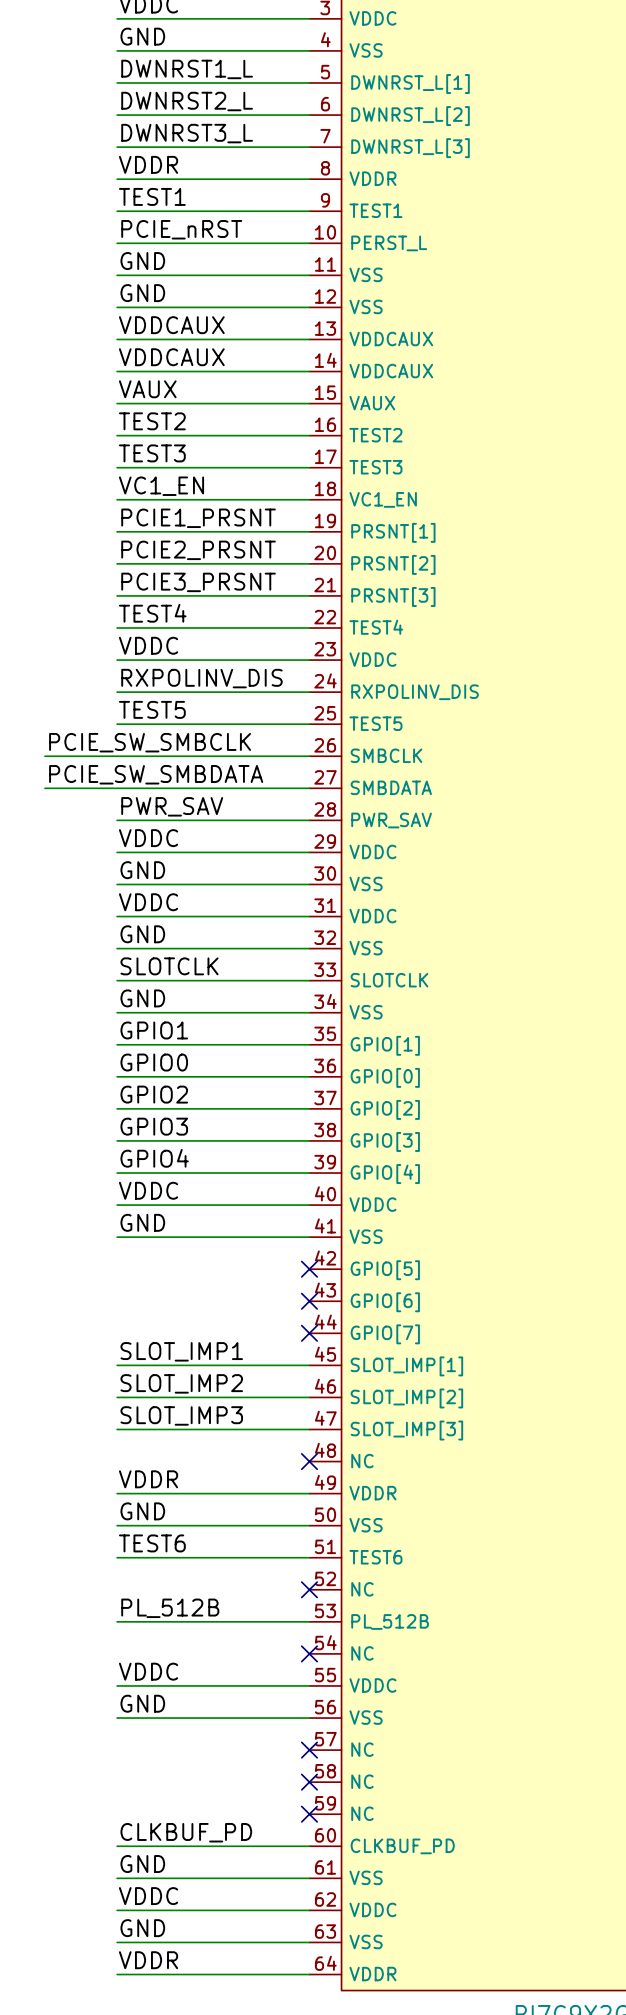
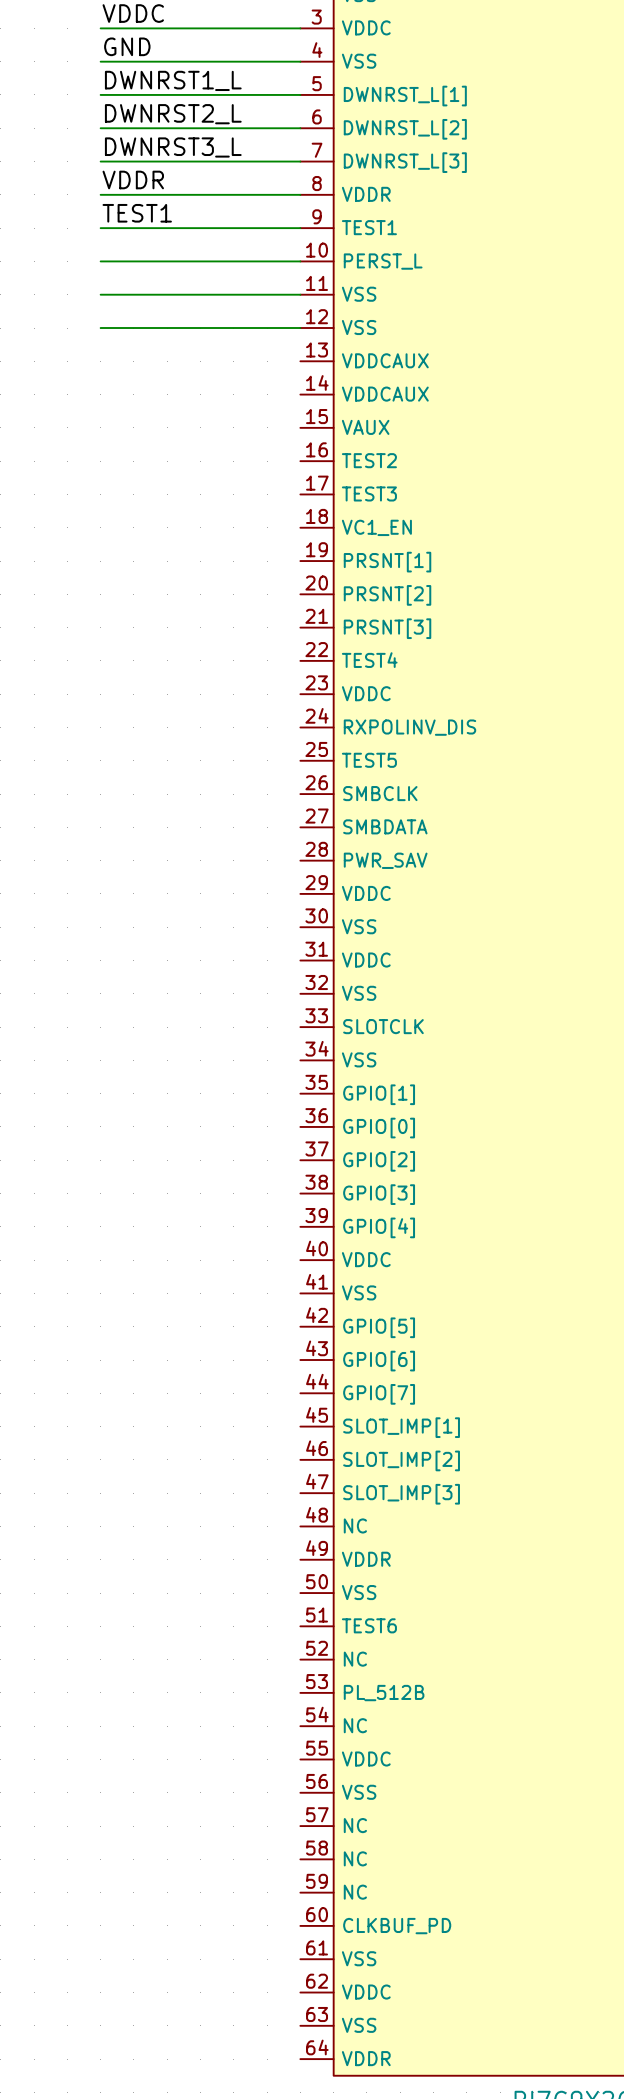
label: PCIE_nRST (181, 229) -> none
label: GND (142, 261) -> none
label: GND (142, 293) -> none
label: VDDCAUX (171, 325) -> none
wire: (117, 339) (309, 339) -> none
label: VDDCAUX (171, 357) -> none
wire: (117, 371) (309, 371) -> none
label: VAUX (147, 389) -> none
wire: (117, 403) (309, 403) -> none
label: TEST2 (152, 421) -> none
wire: (117, 435) (309, 435) -> none
label: TEST3 (152, 453) -> none
wire: (117, 467) (309, 467) -> none
label: VC1_EN (161, 486) -> none
wire: (117, 499) (309, 499) -> none
label: PCIE1_PRSNT (198, 518) -> none
wire: (117, 531) (309, 531) -> none
label: PCIE2_PRSNT (198, 550) -> none
wire: (117, 563) (309, 563) -> none
label: PCIE3_PRSNT (198, 582) -> none
wire: (117, 595) (309, 595) -> none
label: TEST4 (152, 613) -> none
wire: (117, 628) (309, 628) -> none
label: VDDC (148, 645) -> none
wire: (117, 660) (309, 660) -> none
label: RXPOLINV_DIS (201, 678) -> none
wire: (117, 692) (309, 692) -> none
label: TEST5 (152, 709) -> none
wire: (117, 724) (309, 724) -> none
label: PCIE_SW_SMBCLK (150, 742) -> none
wire: (44, 756) (309, 756) -> none
label: PCIE_SW_SMBDATA (156, 774) -> none
wire: (44, 788) (309, 788) -> none
label: PWR_SAV (172, 806) -> none
wire: (117, 820) (309, 820) -> none
label: VDDC (148, 838) -> none
wire: (117, 852) (309, 852) -> none
label: GND (142, 870) -> none
wire: (117, 884) (309, 884) -> none
label: VDDC (148, 902) -> none
wire: (117, 916) (309, 916) -> none
label: GND (142, 934) -> none
wire: (117, 948) (309, 948) -> none
label: SLOTCLK (169, 966) -> none
wire: (117, 980) (309, 980) -> none
label: GND (142, 998) -> none
wire: (117, 1012) (309, 1012) -> none
label: GPIO1 (154, 1030) -> none
wire: (117, 1044) (309, 1044) -> none
label: GPIO0 (154, 1062) -> none
wire: (117, 1076) (309, 1076) -> none
label: GPIO2 (154, 1094) -> none
wire: (117, 1108) (309, 1108) -> none
label: GPIO3 (154, 1126) -> none
wire: (117, 1140) (309, 1140) -> none
label: GPIO4 (154, 1158) -> none
wire: (117, 1173) (309, 1173) -> none
label: VDDC (148, 1190) -> none
wire: (117, 1205) (309, 1205) -> none
label: GND (142, 1222) -> none
wire: (117, 1237) (309, 1237) -> none
no-connect mark: (309, 1269) -> none
no-connect mark: (309, 1301) -> none
no-connect mark: (309, 1333) -> none
label: SLOT_IMP1 (181, 1351) -> none
wire: (117, 1365) (309, 1365) -> none
label: SLOT_IMP2 (181, 1383) -> none
wire: (117, 1397) (309, 1397) -> none
label: SLOT_IMP3 (181, 1415) -> none
wire: (117, 1429) (309, 1429) -> none
no-connect mark: (309, 1461) -> none
label: VDDR (148, 1479) -> none
wire: (117, 1493) (309, 1493) -> none
label: GND (142, 1511) -> none
wire: (117, 1525) (309, 1525) -> none
label: TEST6 (152, 1543) -> none
wire: (117, 1557) (309, 1557) -> none
no-connect mark: (309, 1589) -> none
label: PL_512B (170, 1608) -> none
wire: (117, 1621) (309, 1621) -> none
no-connect mark: (309, 1653) -> none
label: VDDC (148, 1671) -> none
wire: (117, 1685) (309, 1685) -> none
label: GND (142, 1703) -> none
wire: (117, 1718) (309, 1718) -> none
no-connect mark: (309, 1750) -> none
no-connect mark: (309, 1782) -> none
no-connect mark: (309, 1814) -> none
label: CLKBUF_PD (186, 1832) -> none
wire: (117, 1846) (309, 1846) -> none
label: GND (142, 1864) -> none
wire: (117, 1878) (309, 1878) -> none
label: VDDC (148, 1896) -> none
wire: (117, 1910) (309, 1910) -> none
label: GND (142, 1928) -> none
wire: (117, 1942) (309, 1942) -> none
label: VDDR (148, 1960) -> none
wire: (117, 1974) (309, 1974) -> none

